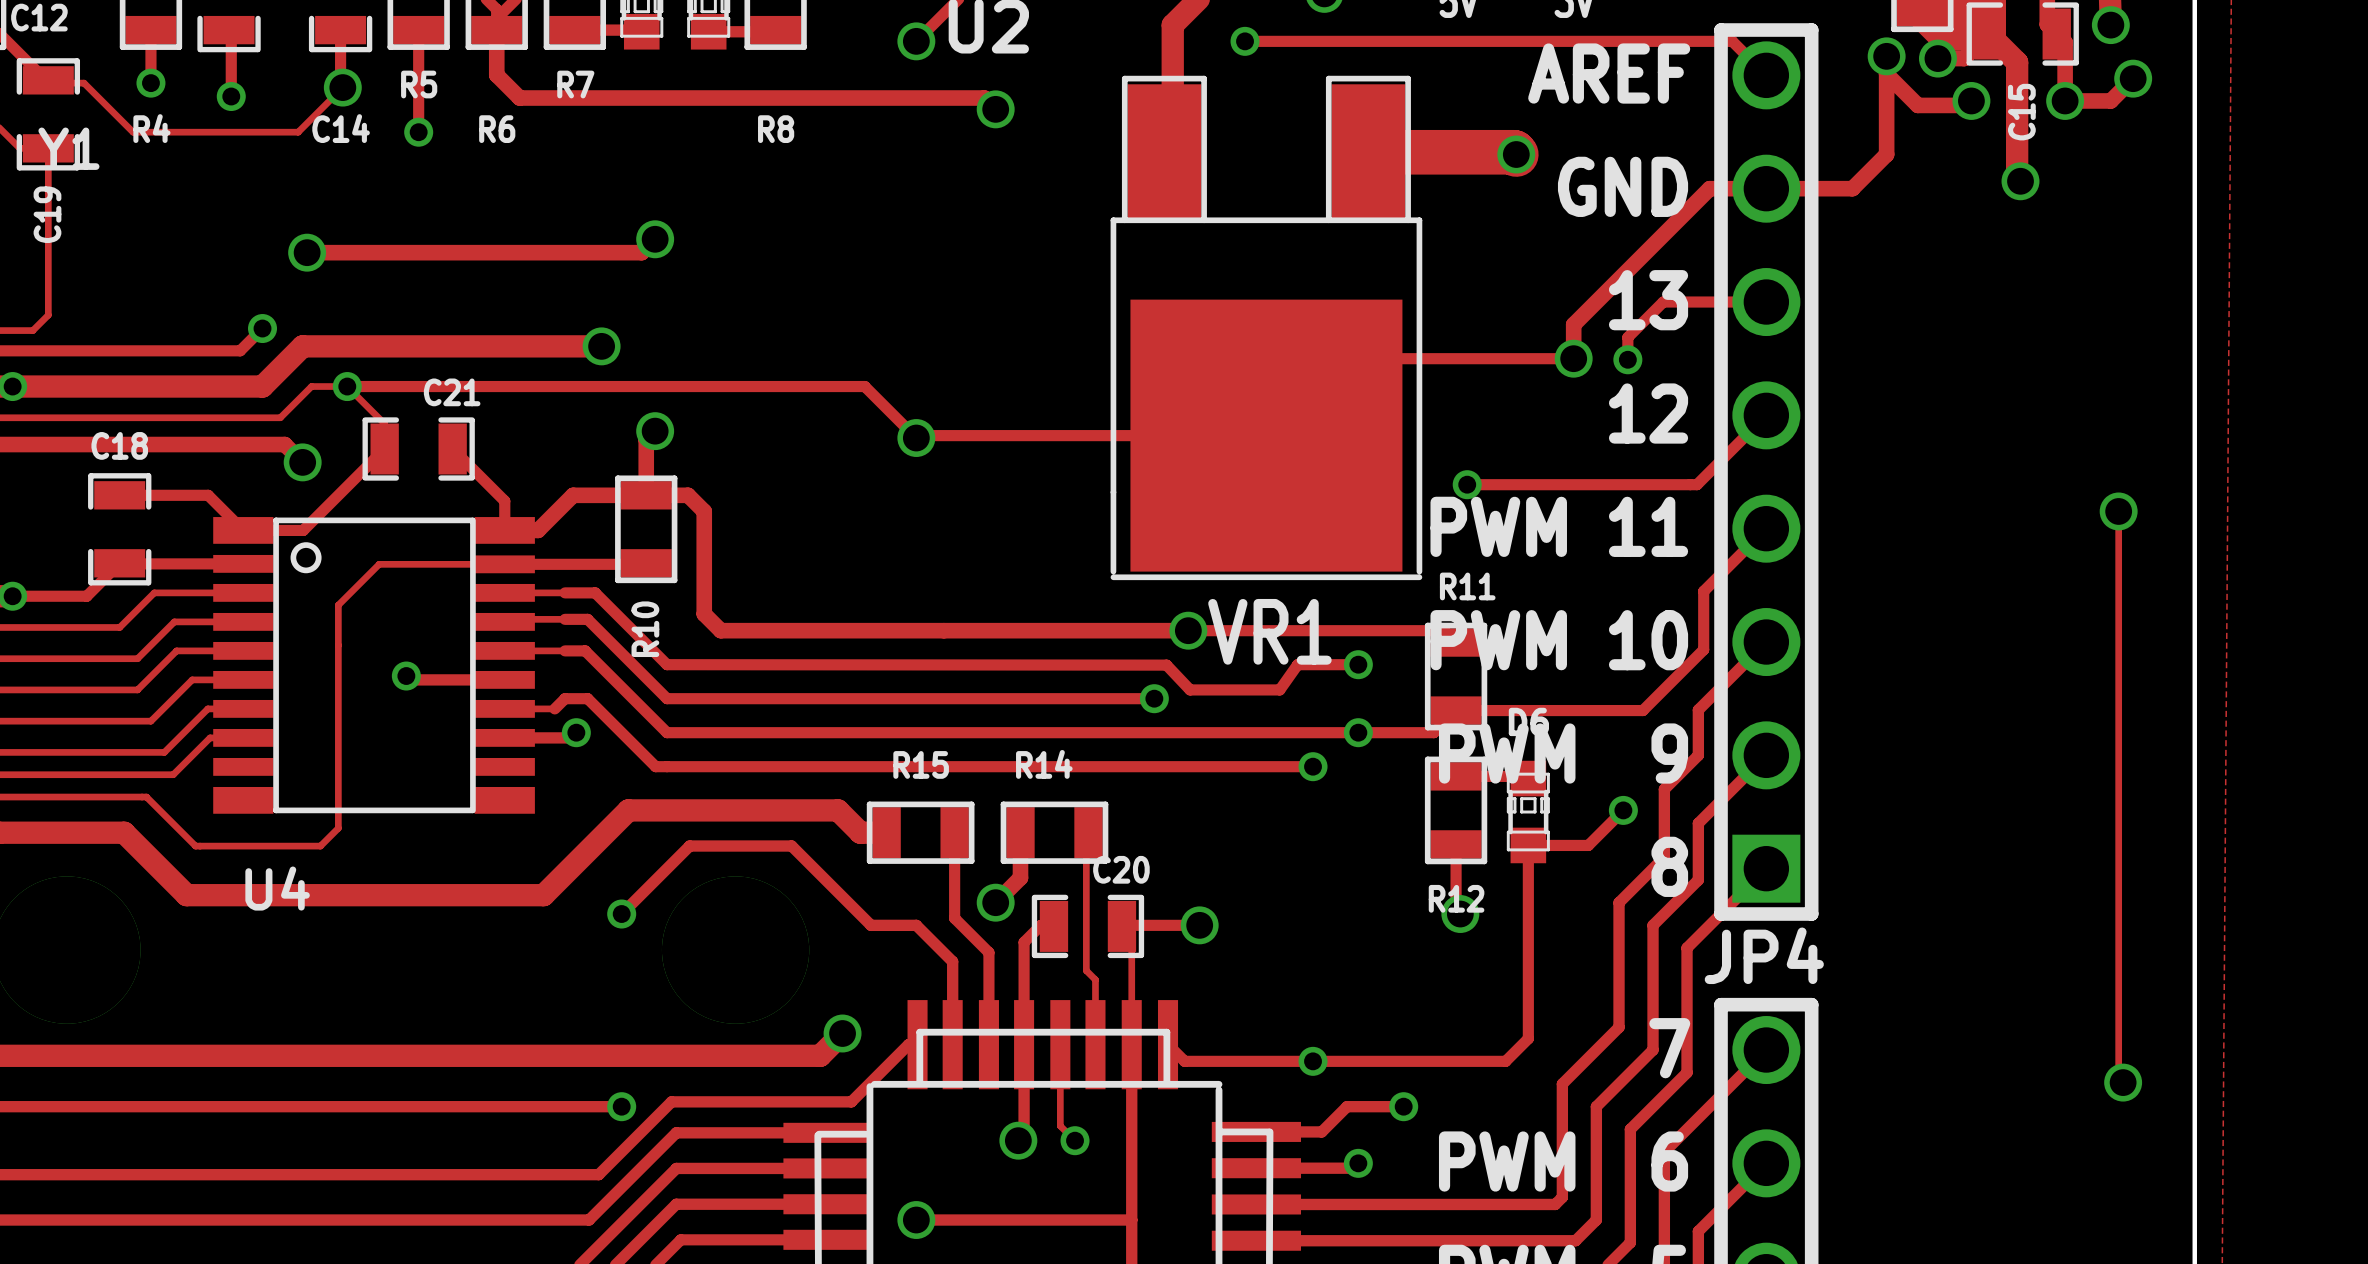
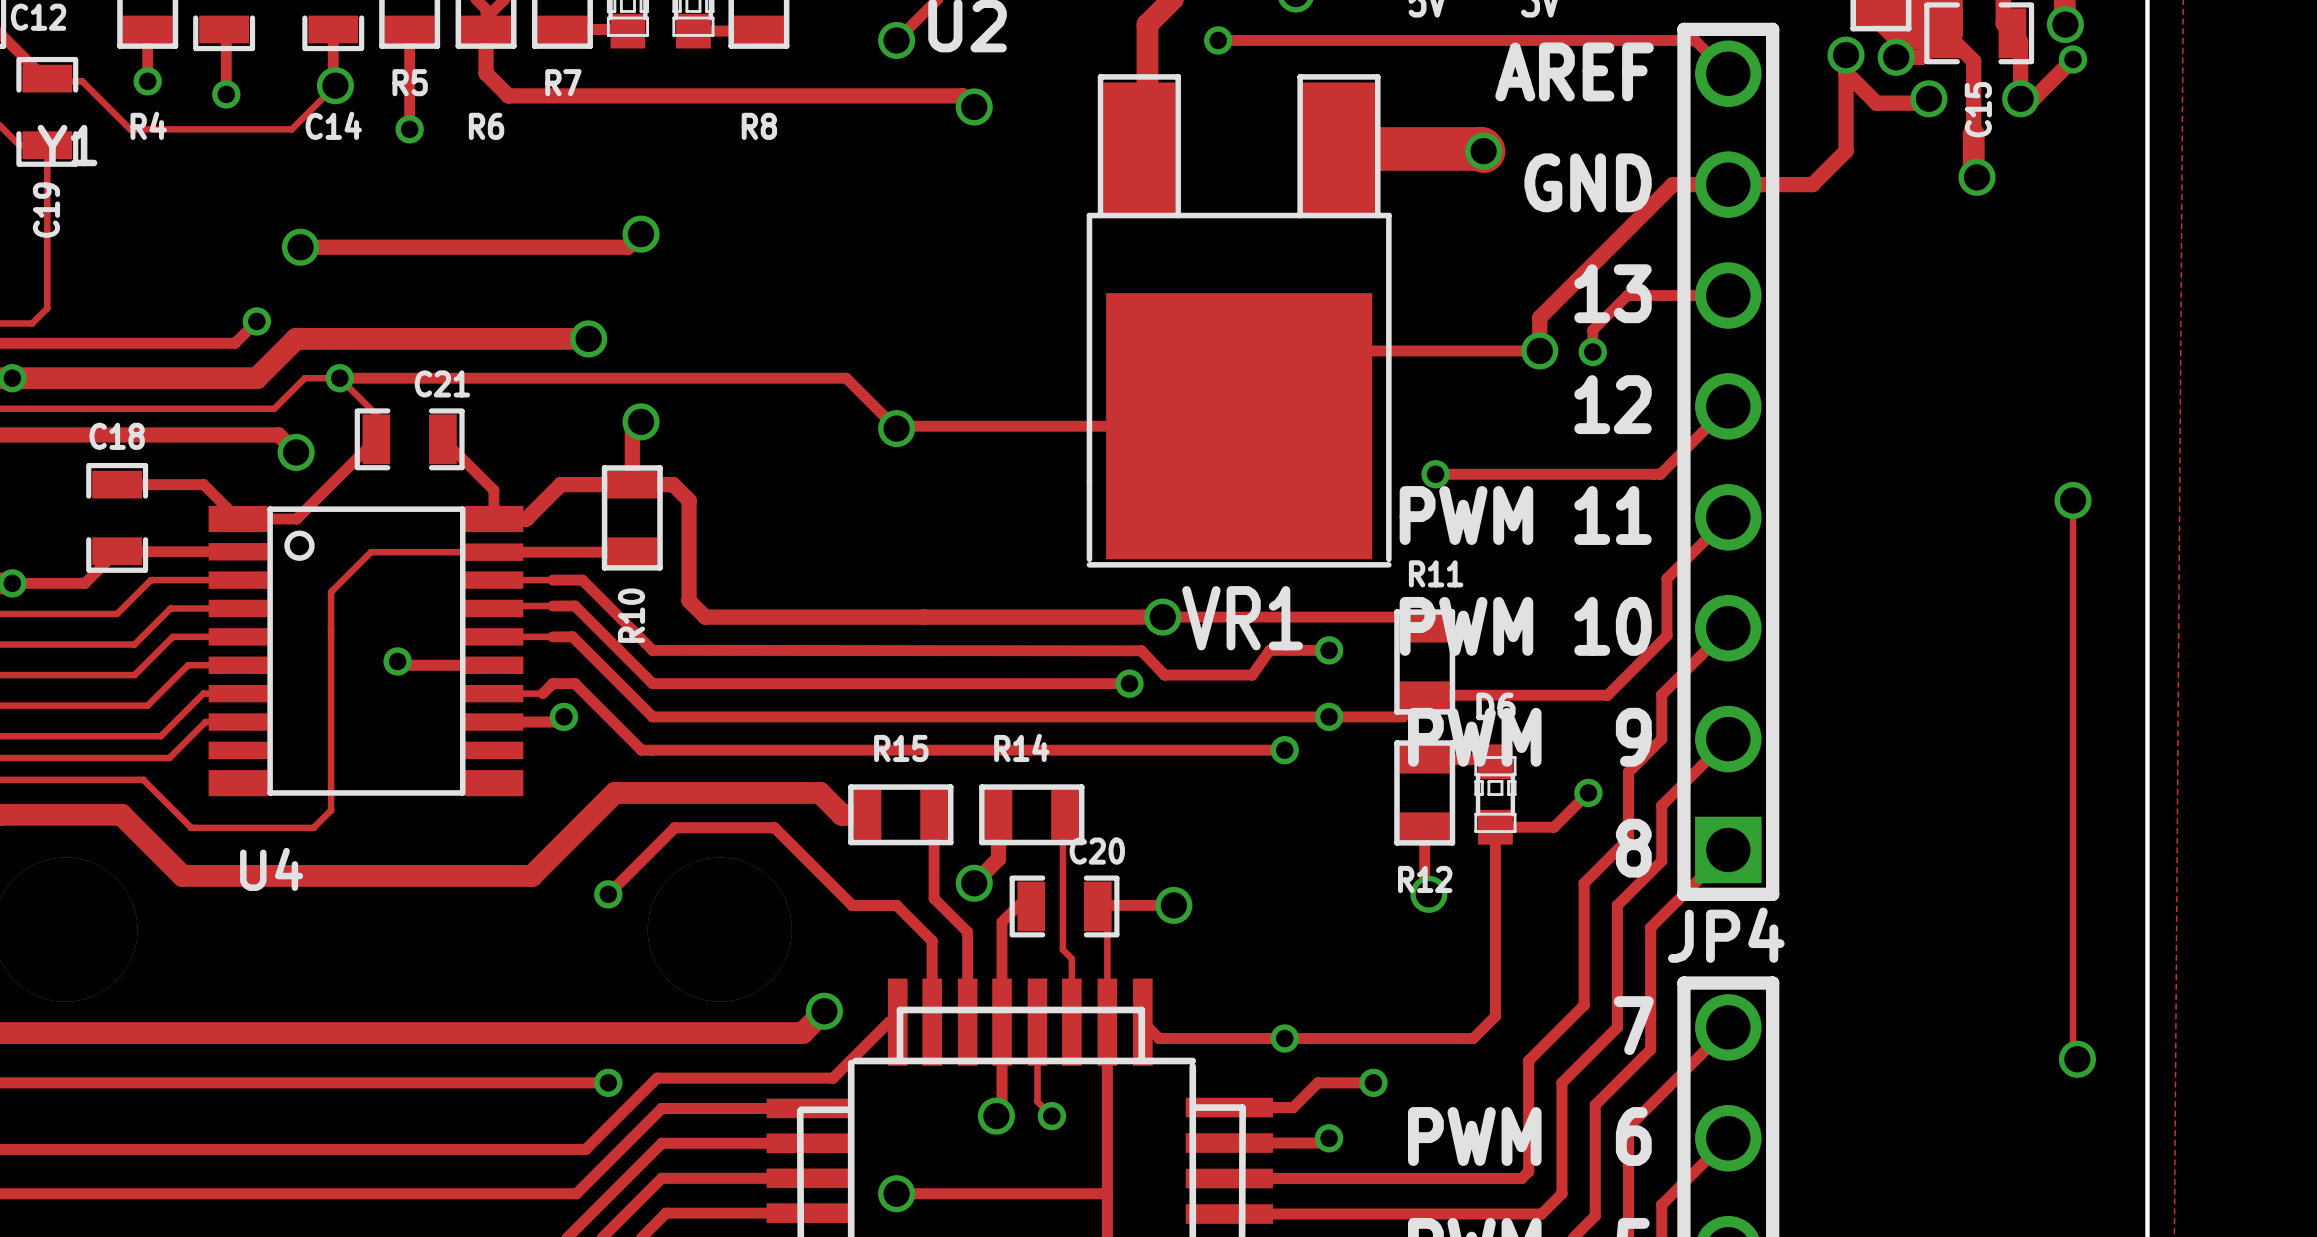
track width: thick (1988, 34) (2017, 62) (2017, 136) -> thin (1945, 33) (1973, 61) (1973, 133)
track: (2133, 78) (2110, 100) (2078, 100) -> (2073, 59) (2033, 98)
via position: (2133, 78) -> (2073, 59)

